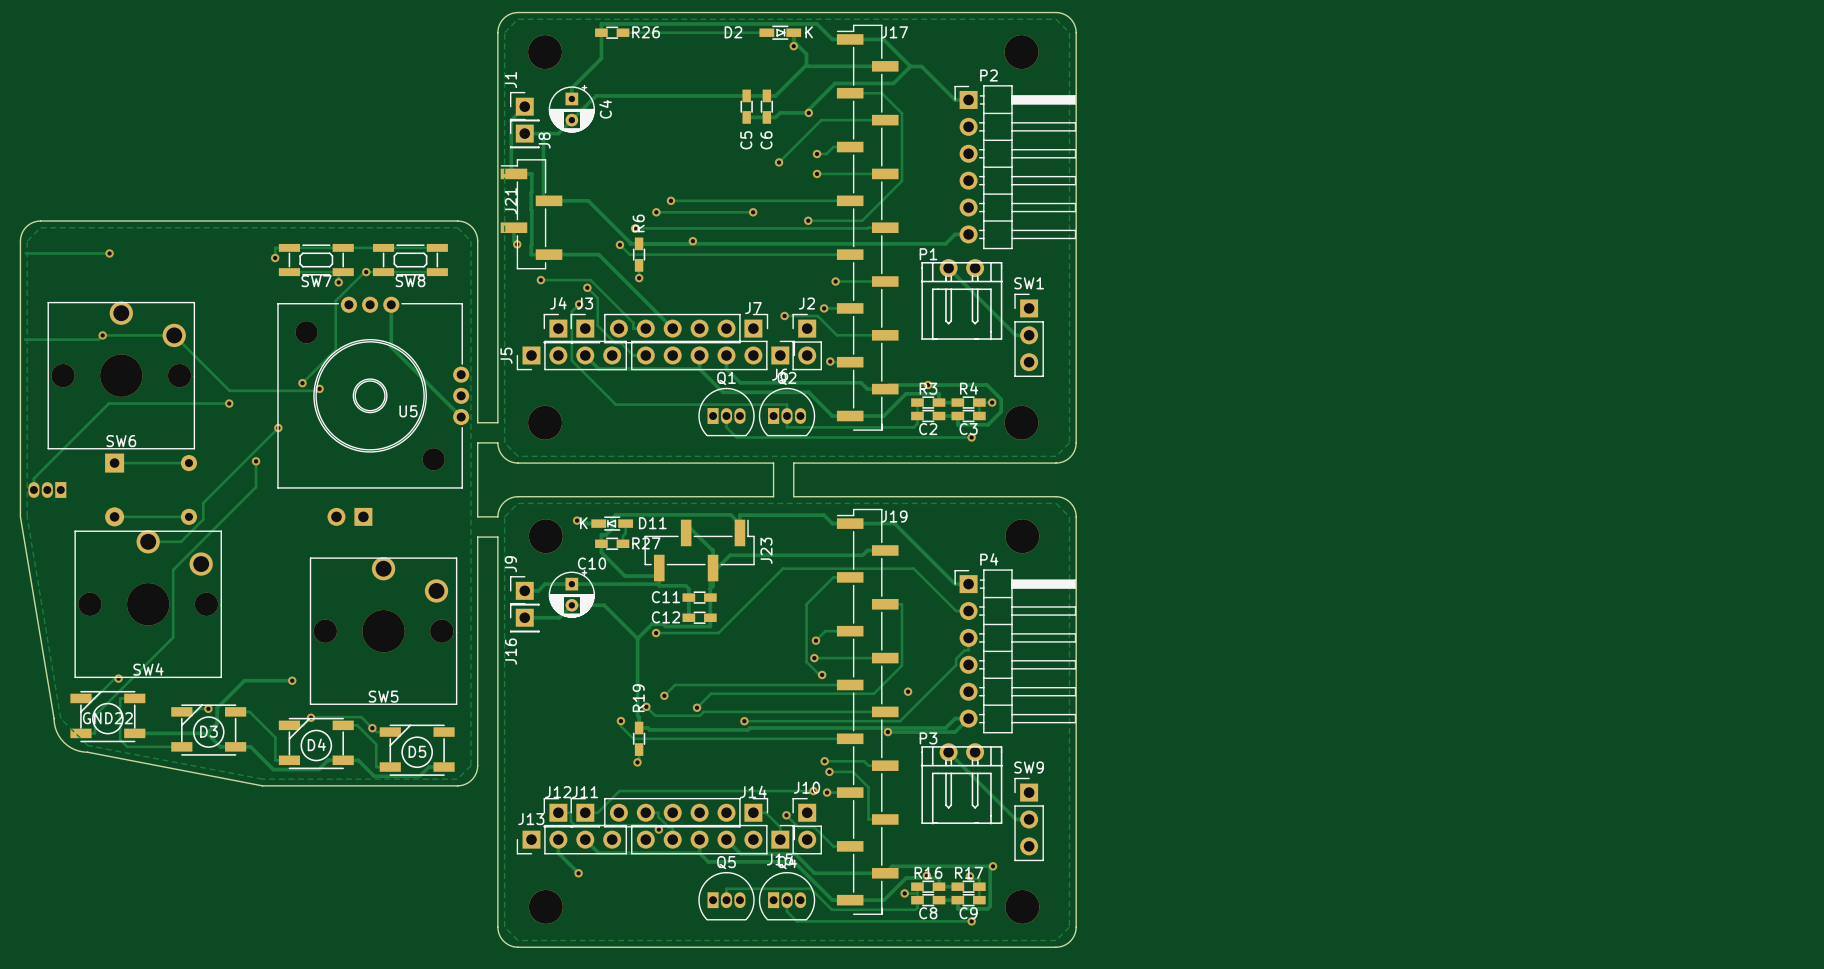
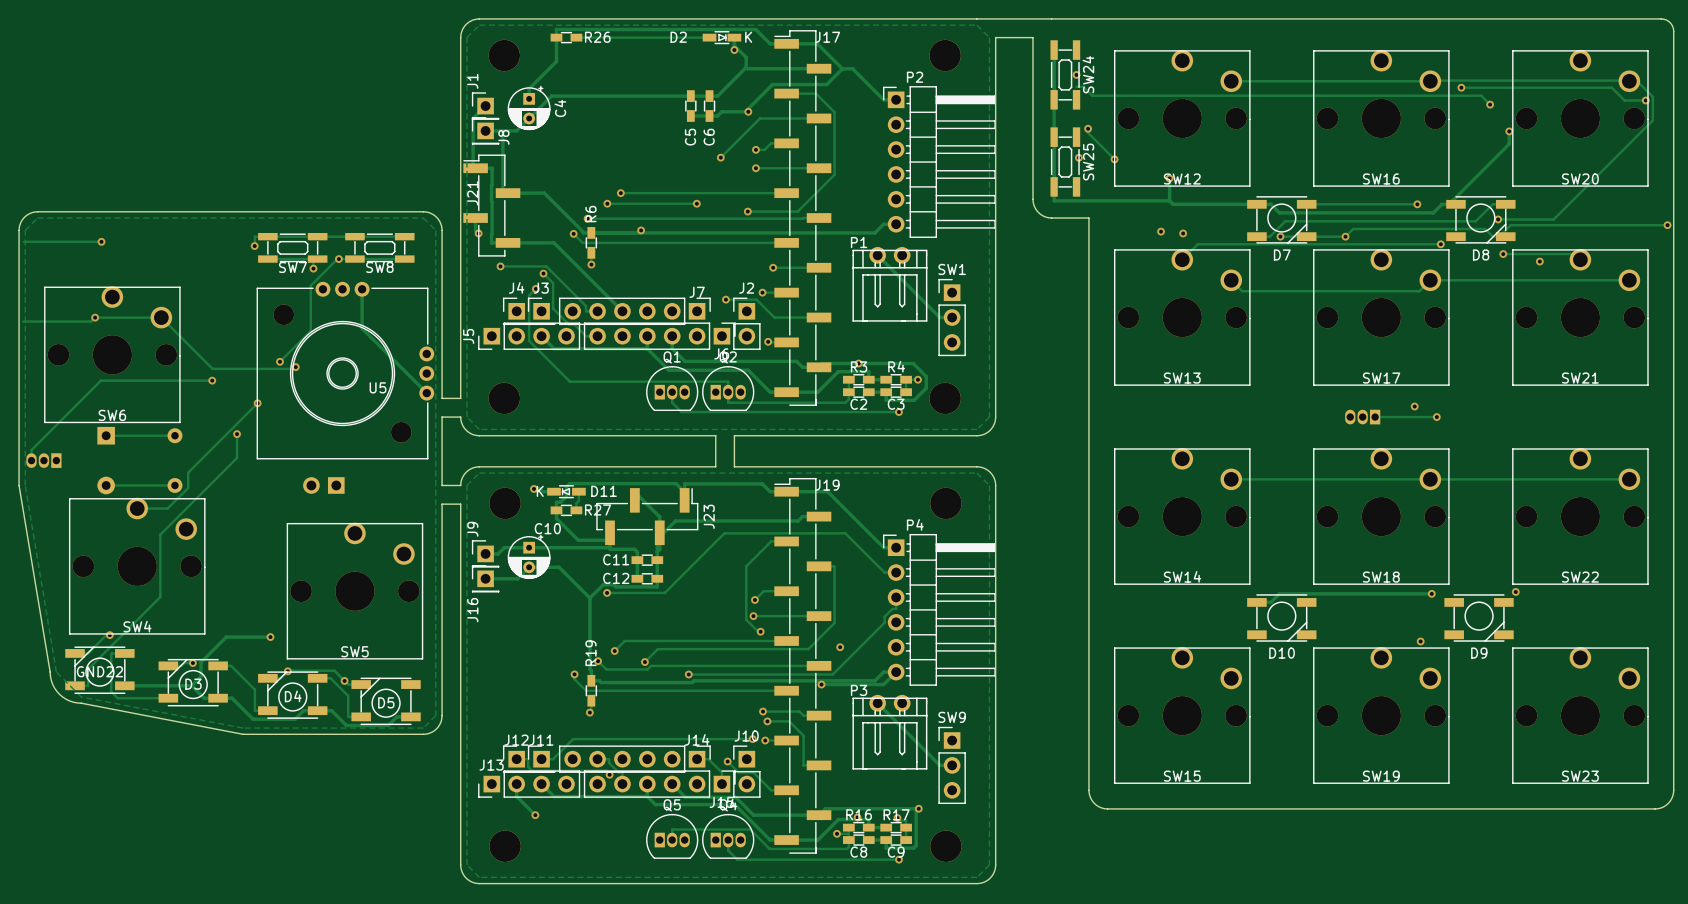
board edge: (1056, 12) (1063, 14) (1070, 18) (1074, 24) (1076, 32) -> (977, 18) (1661, 18) (1670, 22) (1673, 31) (1673, 790) (1668, 803) (1655, 808) (1107, 808) (1094, 803) (1088, 790) (1088, 218) (1051, 218)
board edge: none -> (995, 37) (1032, 37) (1033, 201) (1038, 212) (1051, 218)
track: none -> (1054, 50) (1054, 200) (1169, 200)
SW24: none -> (1065, 74)
via: none -> (1076, 74)
track: none -> (1231, 81) (1628, 80) (1637, 81) (1652, 96) (1652, 120) (1553, 219) (1498, 219)
track: none -> (1076, 86) (1083, 86) (1092, 95) (1481, 95) (1490, 104)
track: none -> (1461, 87) (1611, 87) (1624, 100) (1645, 100)
via: none -> (1461, 87)
via: none -> (1645, 100)
via: none -> (1490, 104)
SW12: none -> (1182, 118)
SW16: none -> (1381, 118)
SW20: none -> (1580, 118)
track: none -> (1088, 128) (1088, 132) (1114, 159)
via: none -> (1088, 128)
track: none -> (1509, 131) (1509, 144) (1449, 204)
via: none -> (1509, 131)
via: none -> (1078, 157)
via: none -> (1114, 159)
SW25: none -> (1065, 162)
track: none -> (1169, 178) (1169, 200)
via: none -> (1169, 178)
track: none -> (1169, 200) (1173, 204) (1270, 204) (1279, 212) (1433, 212) (1442, 204) (1455, 204)
track: none -> (1306, 204) (1417, 204)
via: none -> (1417, 204)
track: none -> (1505, 204) (1492, 204) (1475, 221) (1285, 221) (1269, 236) (1256, 236)
D7: none -> (1281, 219)
D8: none -> (1480, 219)
via: none -> (1498, 219)
track: none -> (1667, 225) (1510, 225) (1499, 236)
via: none -> (1667, 225)
via: none -> (1161, 231)
via: none -> (1183, 233)
track: none -> (1280, 236) (1345, 236) (1353, 228) (1485, 228) (1492, 236) (1505, 236)
via: none -> (1280, 236)
via: none -> (1345, 236)
track: none -> (1440, 244) (1197, 244) (1182, 259)
via: none -> (1440, 244)
track: none -> (1503, 254) (1574, 254) (1580, 259)
via: none -> (1503, 254)
via: none -> (1539, 261)
track: none -> (1231, 280) (1242, 291) (1419, 291) (1430, 280) (1629, 280)
SW13: none -> (1182, 317)
SW17: none -> (1381, 317)
SW21: none -> (1580, 317)
via: none -> (1414, 406)
part: none -> (1362, 417)
track: none -> (1375, 417) (1436, 417)
via: none -> (1436, 417)
track: none -> (1231, 479) (1629, 479)
SW14: none -> (1182, 516)
SW18: none -> (1381, 516)
SW22: none -> (1580, 516)
via: none -> (1515, 591)
track: none -> (1431, 593) (1279, 593) (1270, 602) (1256, 602)
via: none -> (1431, 593)
D10: none -> (1281, 617)
D9: none -> (1479, 617)
via: none -> (1420, 641)
SW15: none -> (1182, 715)
SW19: none -> (1381, 715)
SW23: none -> (1580, 715)

